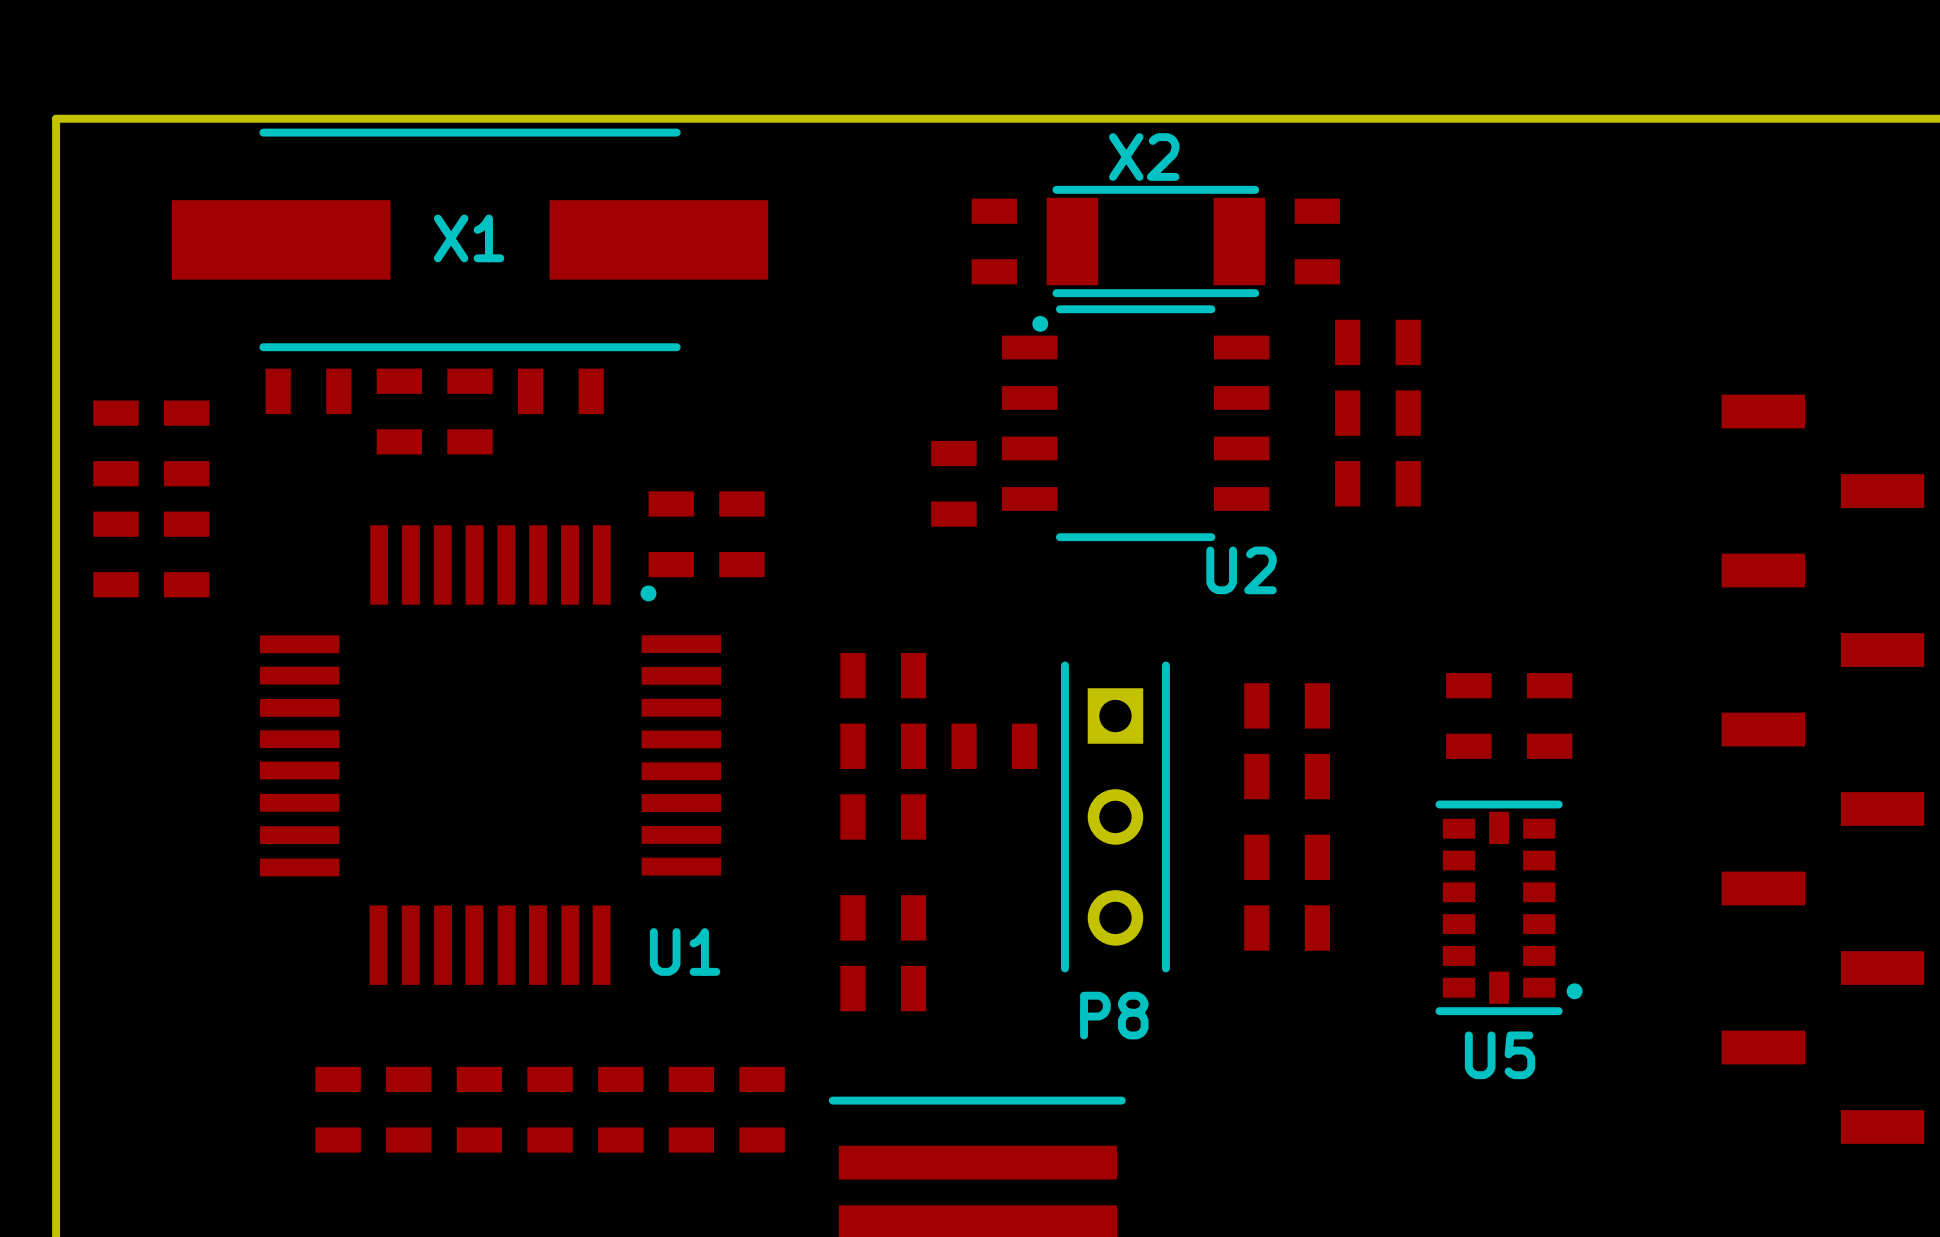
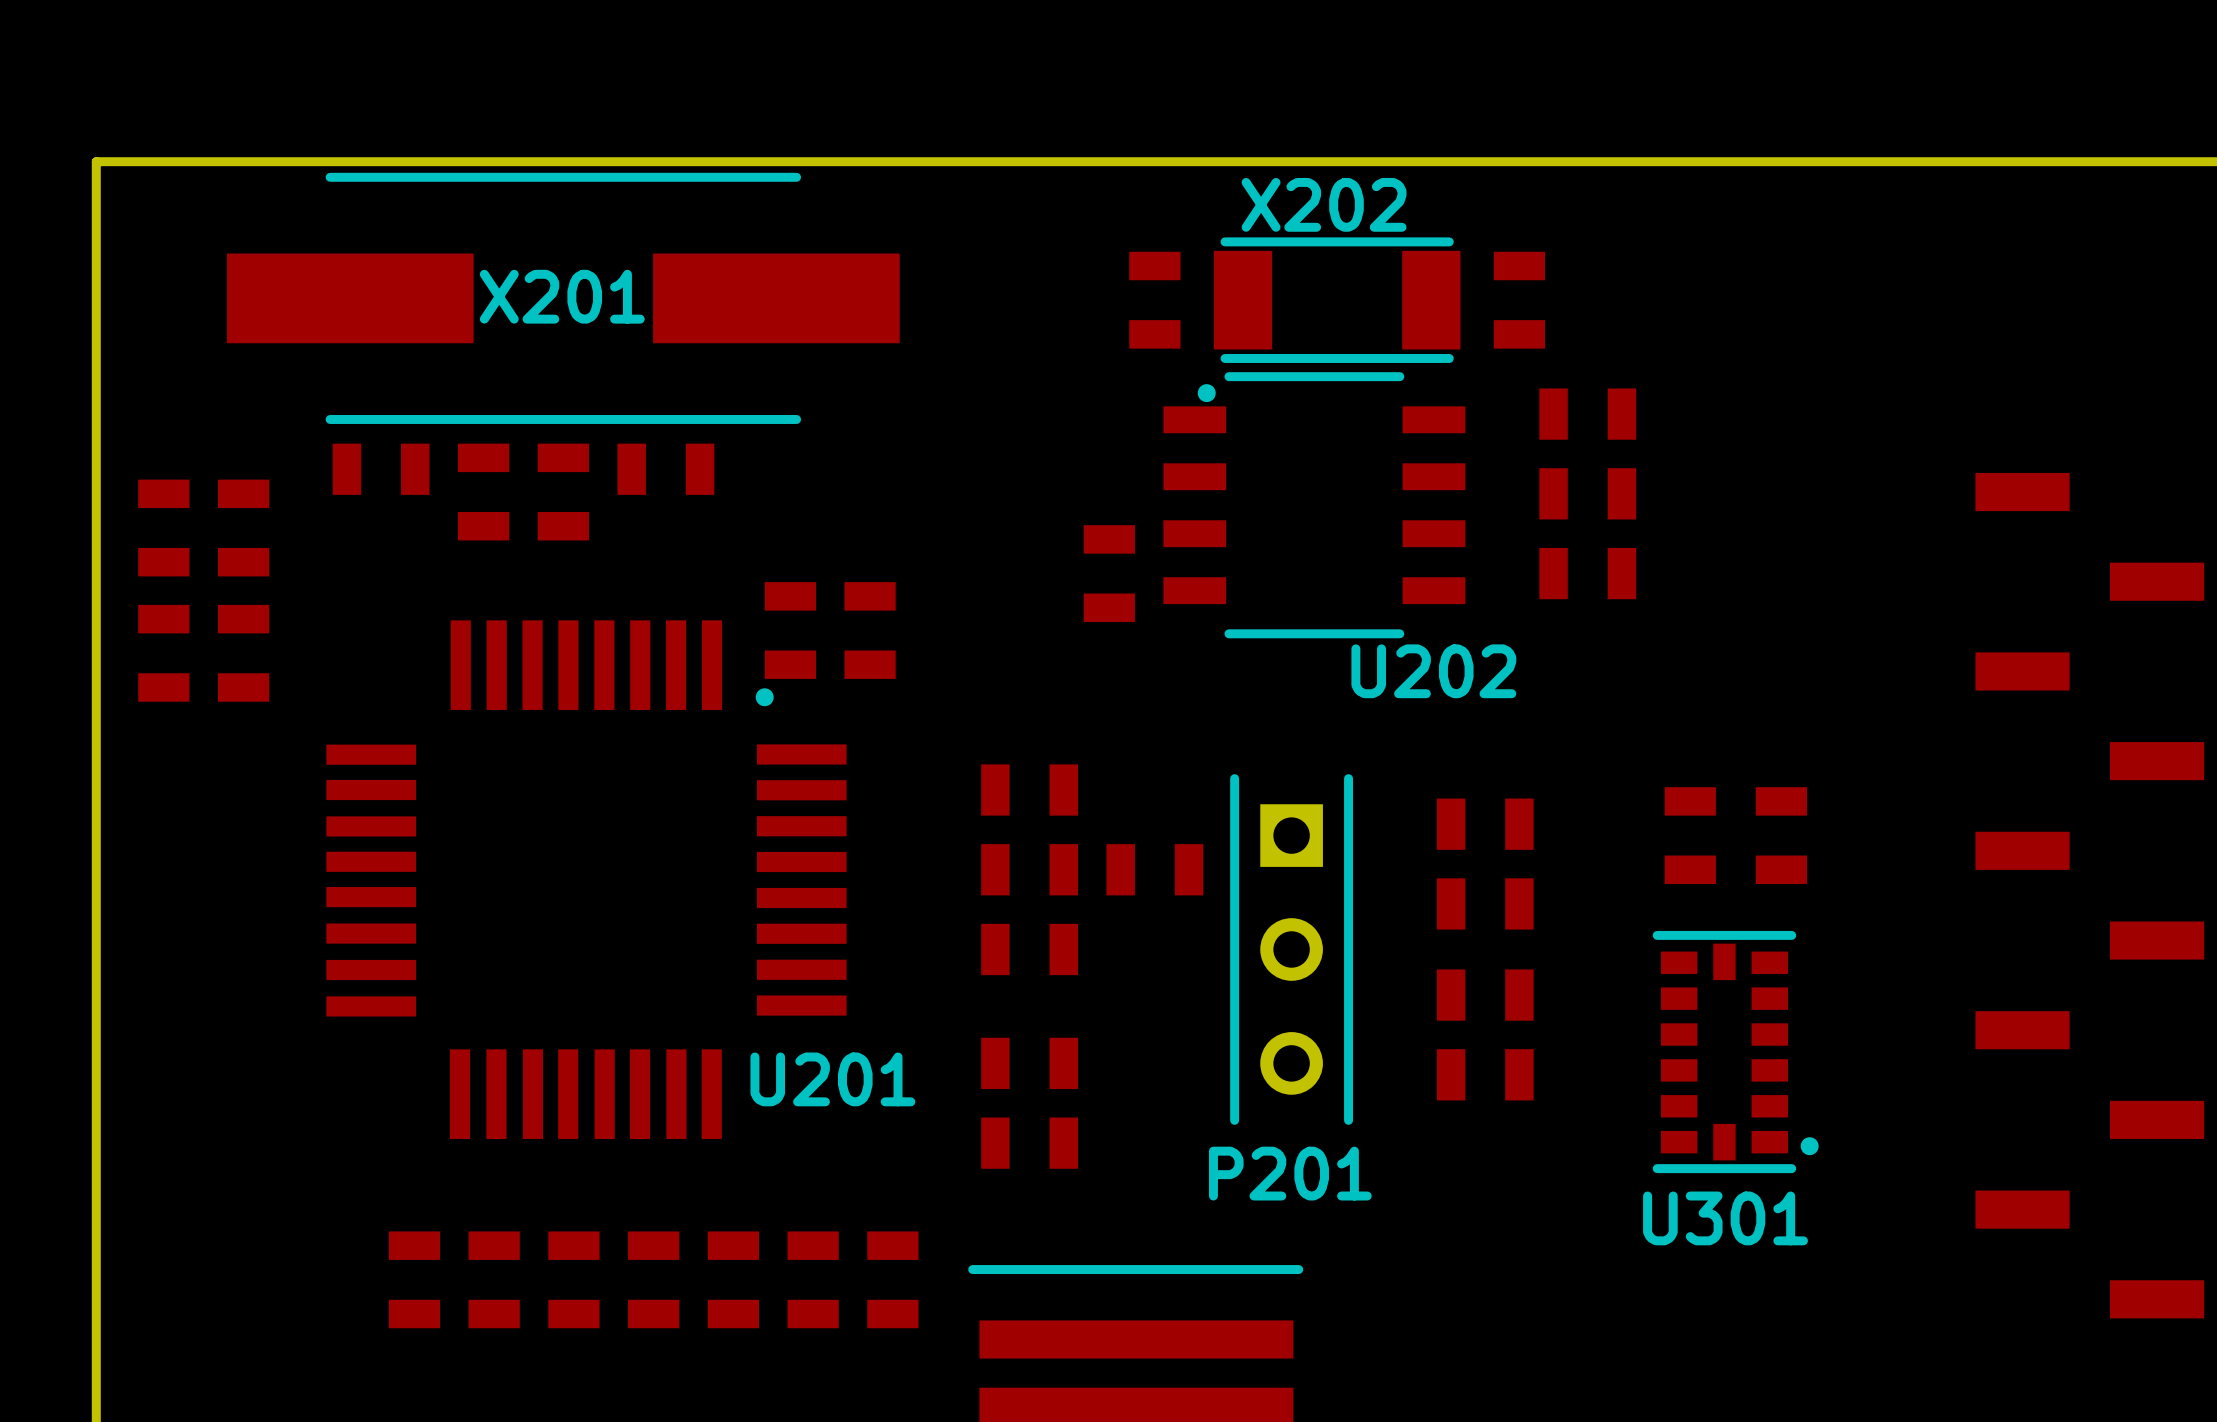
X2 name: X2 (1144, 157) -> X202 (1324, 204)
X1 name: X1 (469, 238) -> X201 (562, 296)
U2 name: U2 (1241, 570) -> U202 (1433, 671)
U1 name: U1 (685, 951) -> U201 (832, 1079)
P8 name: P8 (1114, 1015) -> P201 (1290, 1173)
U5 name: U5 (1500, 1055) -> U301 (1725, 1218)

